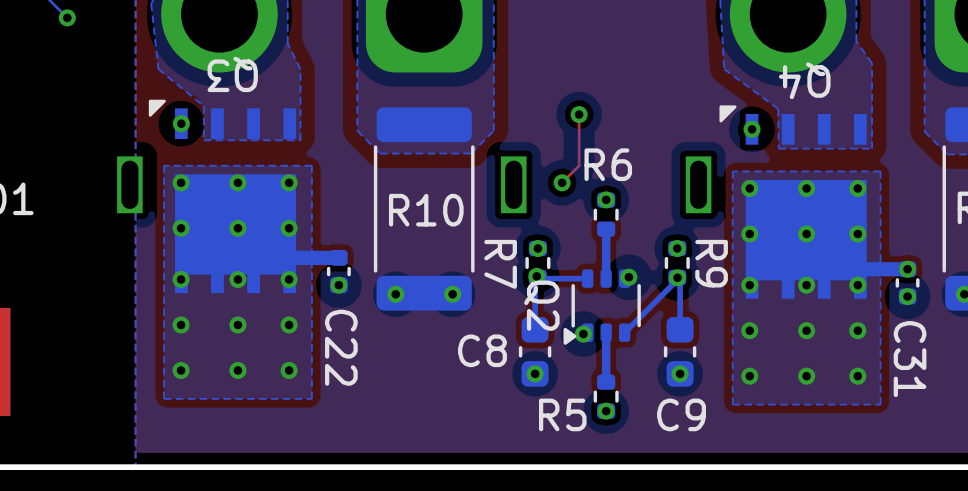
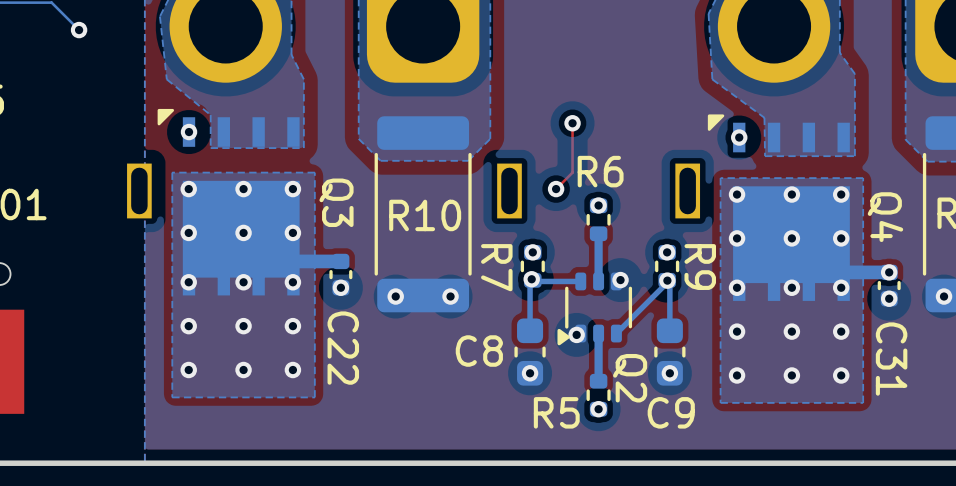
Q3 name rotation: 0° (232, 74) -> 90° counterclockwise (336, 202)
Q3 name position: Q3 (232, 74) -> Q3 (336, 202)
Q4 name rotation: 0° (804, 80) -> 90° counterclockwise (885, 217)
Q4 name position: Q4 (804, 80) -> Q4 (885, 217)
Q2 name position: Q2 (541, 305) -> Q2 (630, 378)

